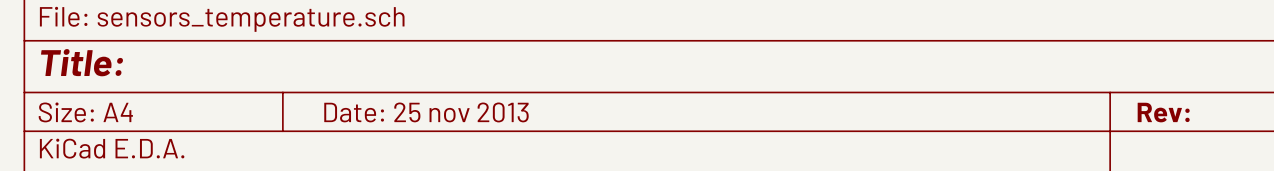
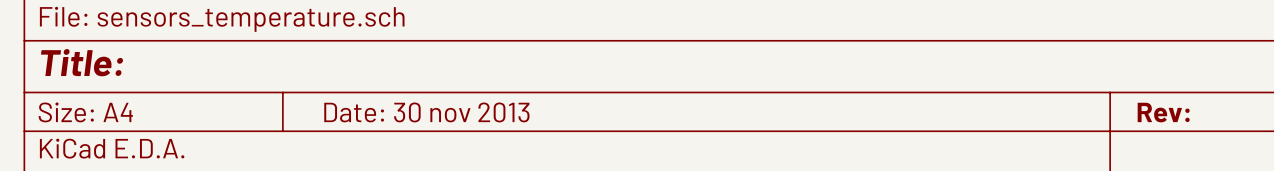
title block: Date: 25 nov 2013 (426, 112) -> Date: 30 nov 2013 (426, 112)

